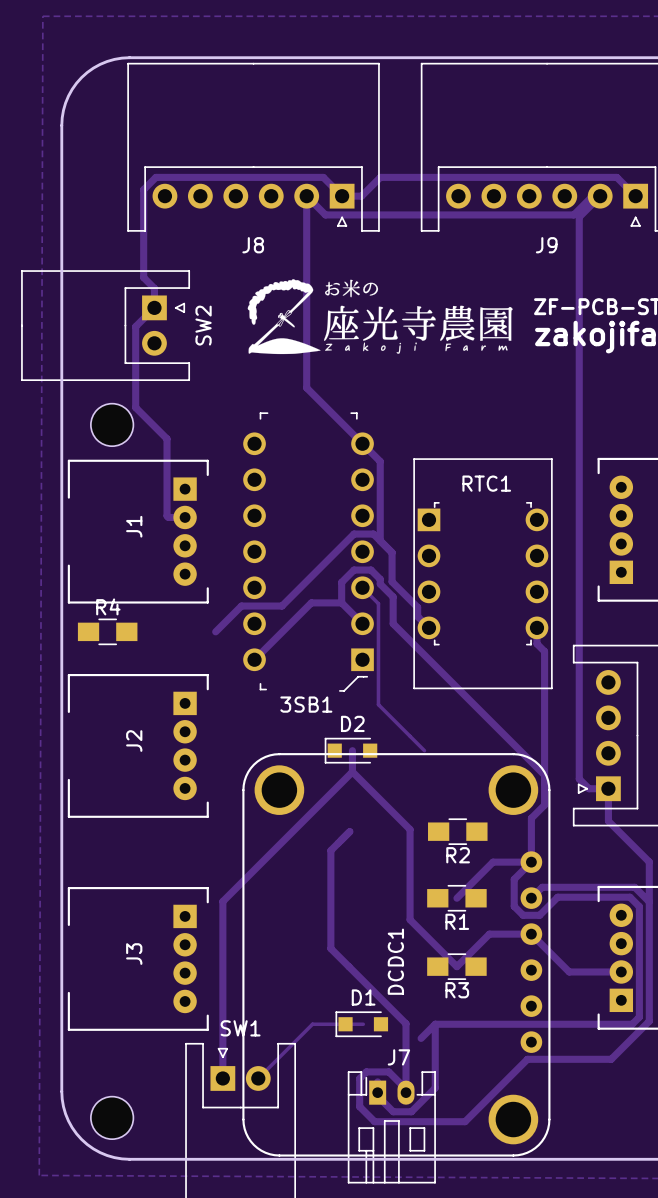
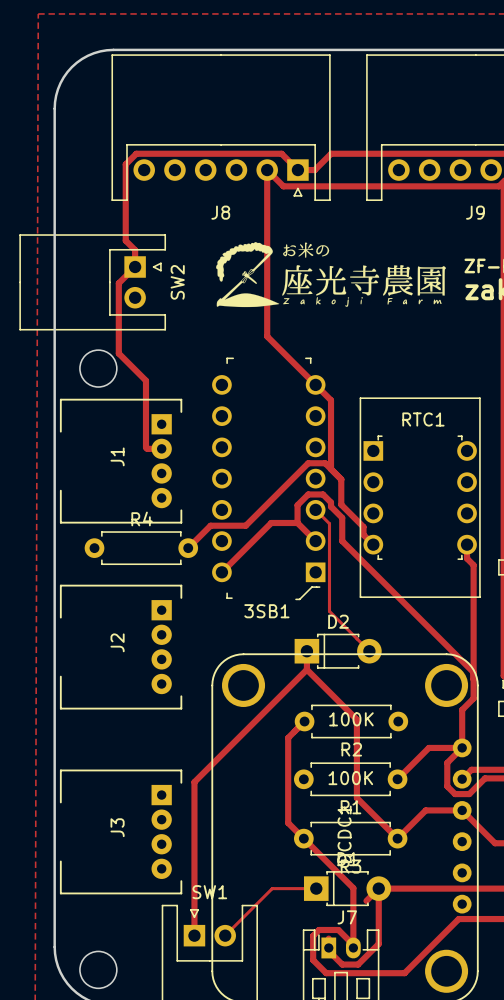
R4 footprint: [77, 618, 138, 646] -> [84, 531, 199, 565]
D2 footprint: [324, 737, 378, 764] -> [294, 633, 382, 669]
R2 footprint: [428, 818, 488, 845] -> [294, 704, 409, 739]
R2 value: none -> 100K (351, 719)
R1 footprint: [427, 884, 487, 912] -> [294, 762, 408, 797]
R1 value: none -> 100K (350, 778)
R3 footprint: [427, 953, 487, 980] -> [294, 821, 408, 856]
D1 footprint: [335, 1011, 389, 1038] -> [303, 871, 392, 907]

